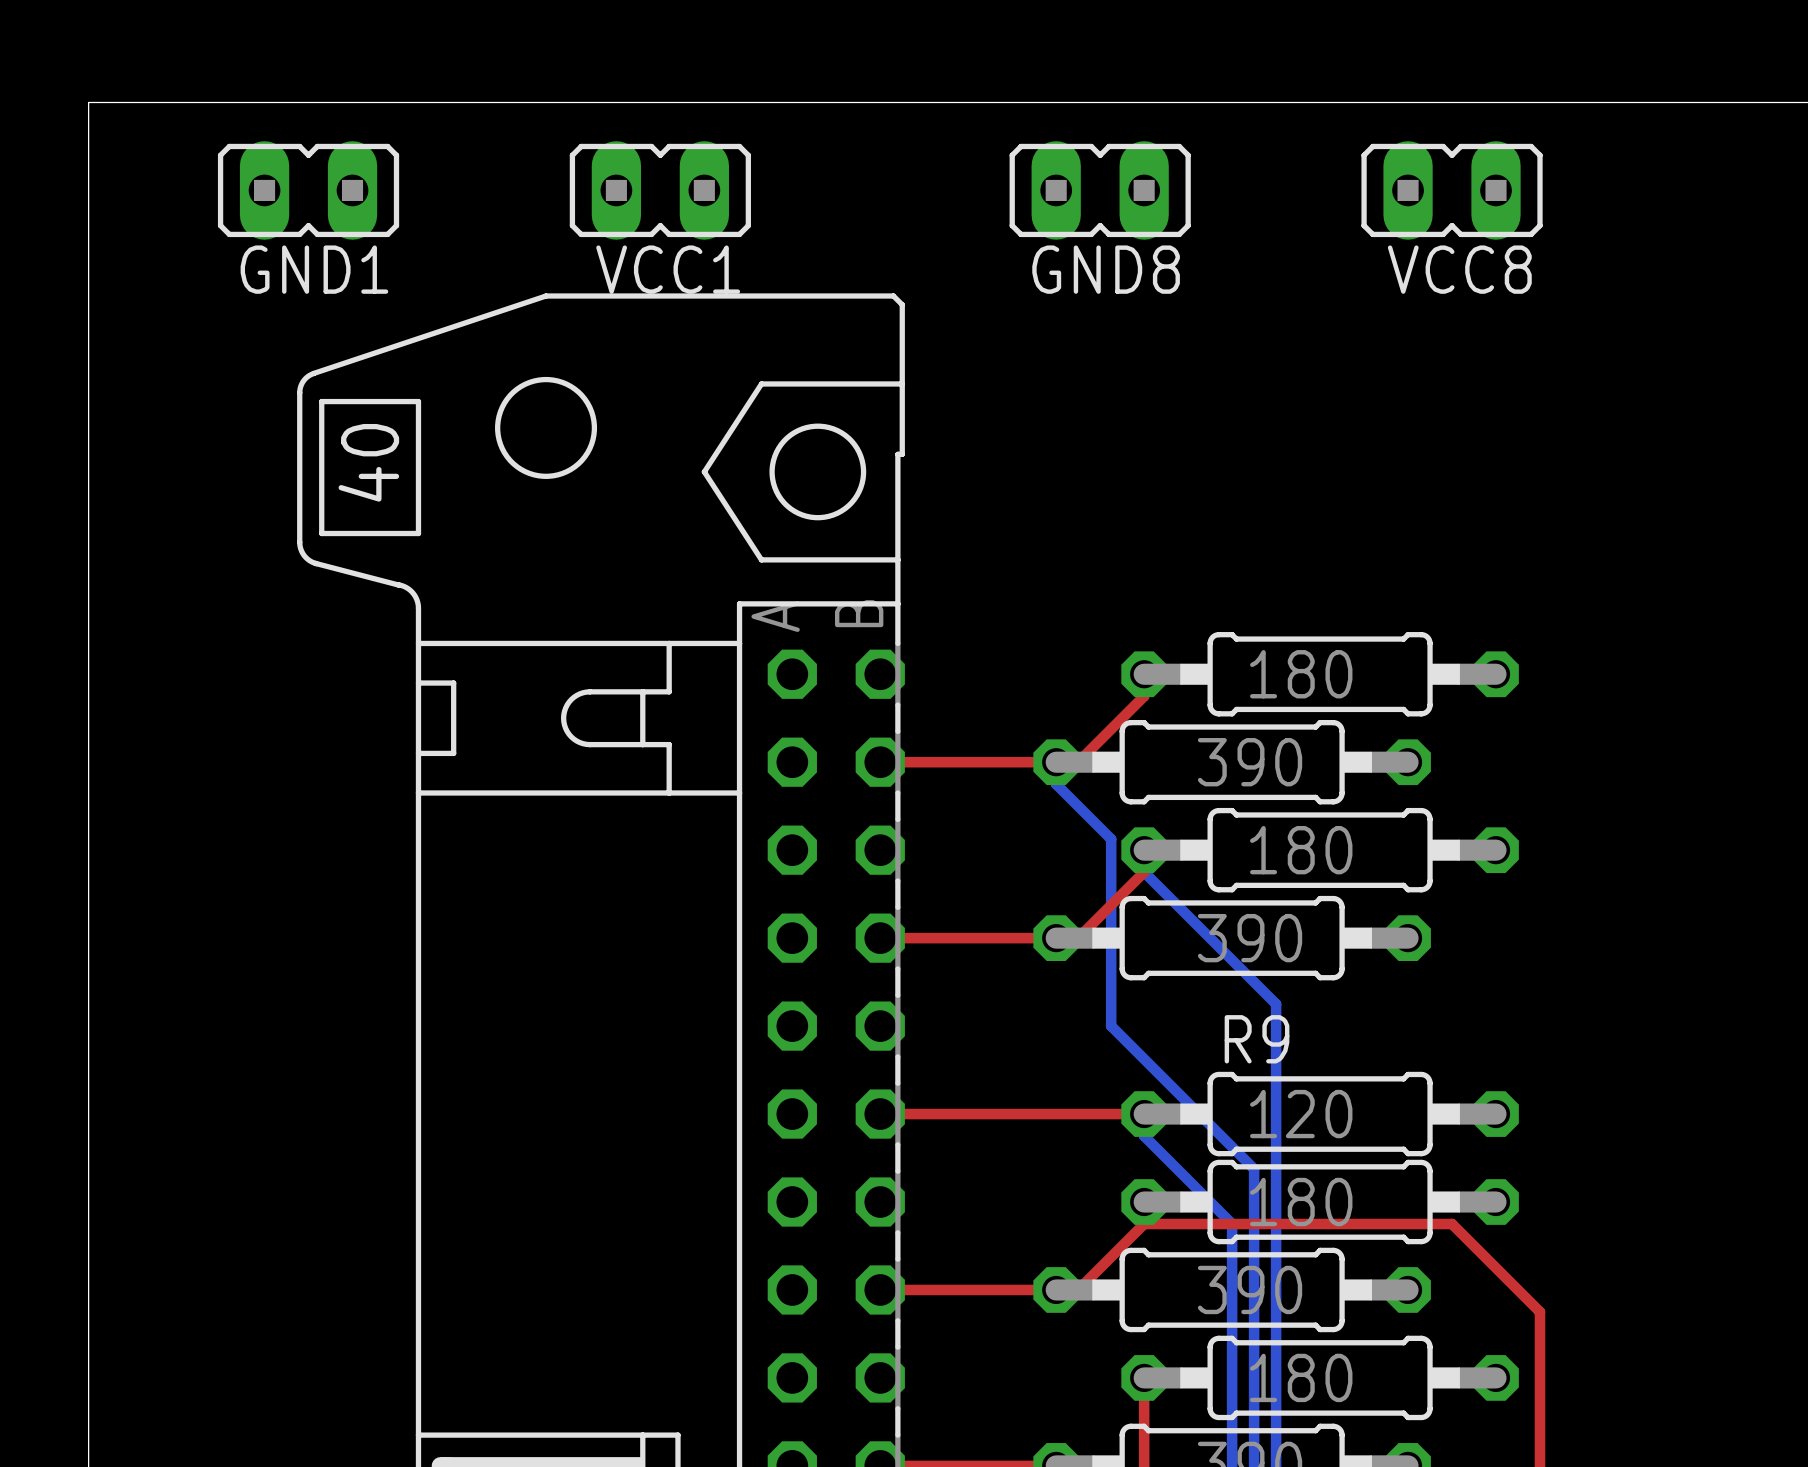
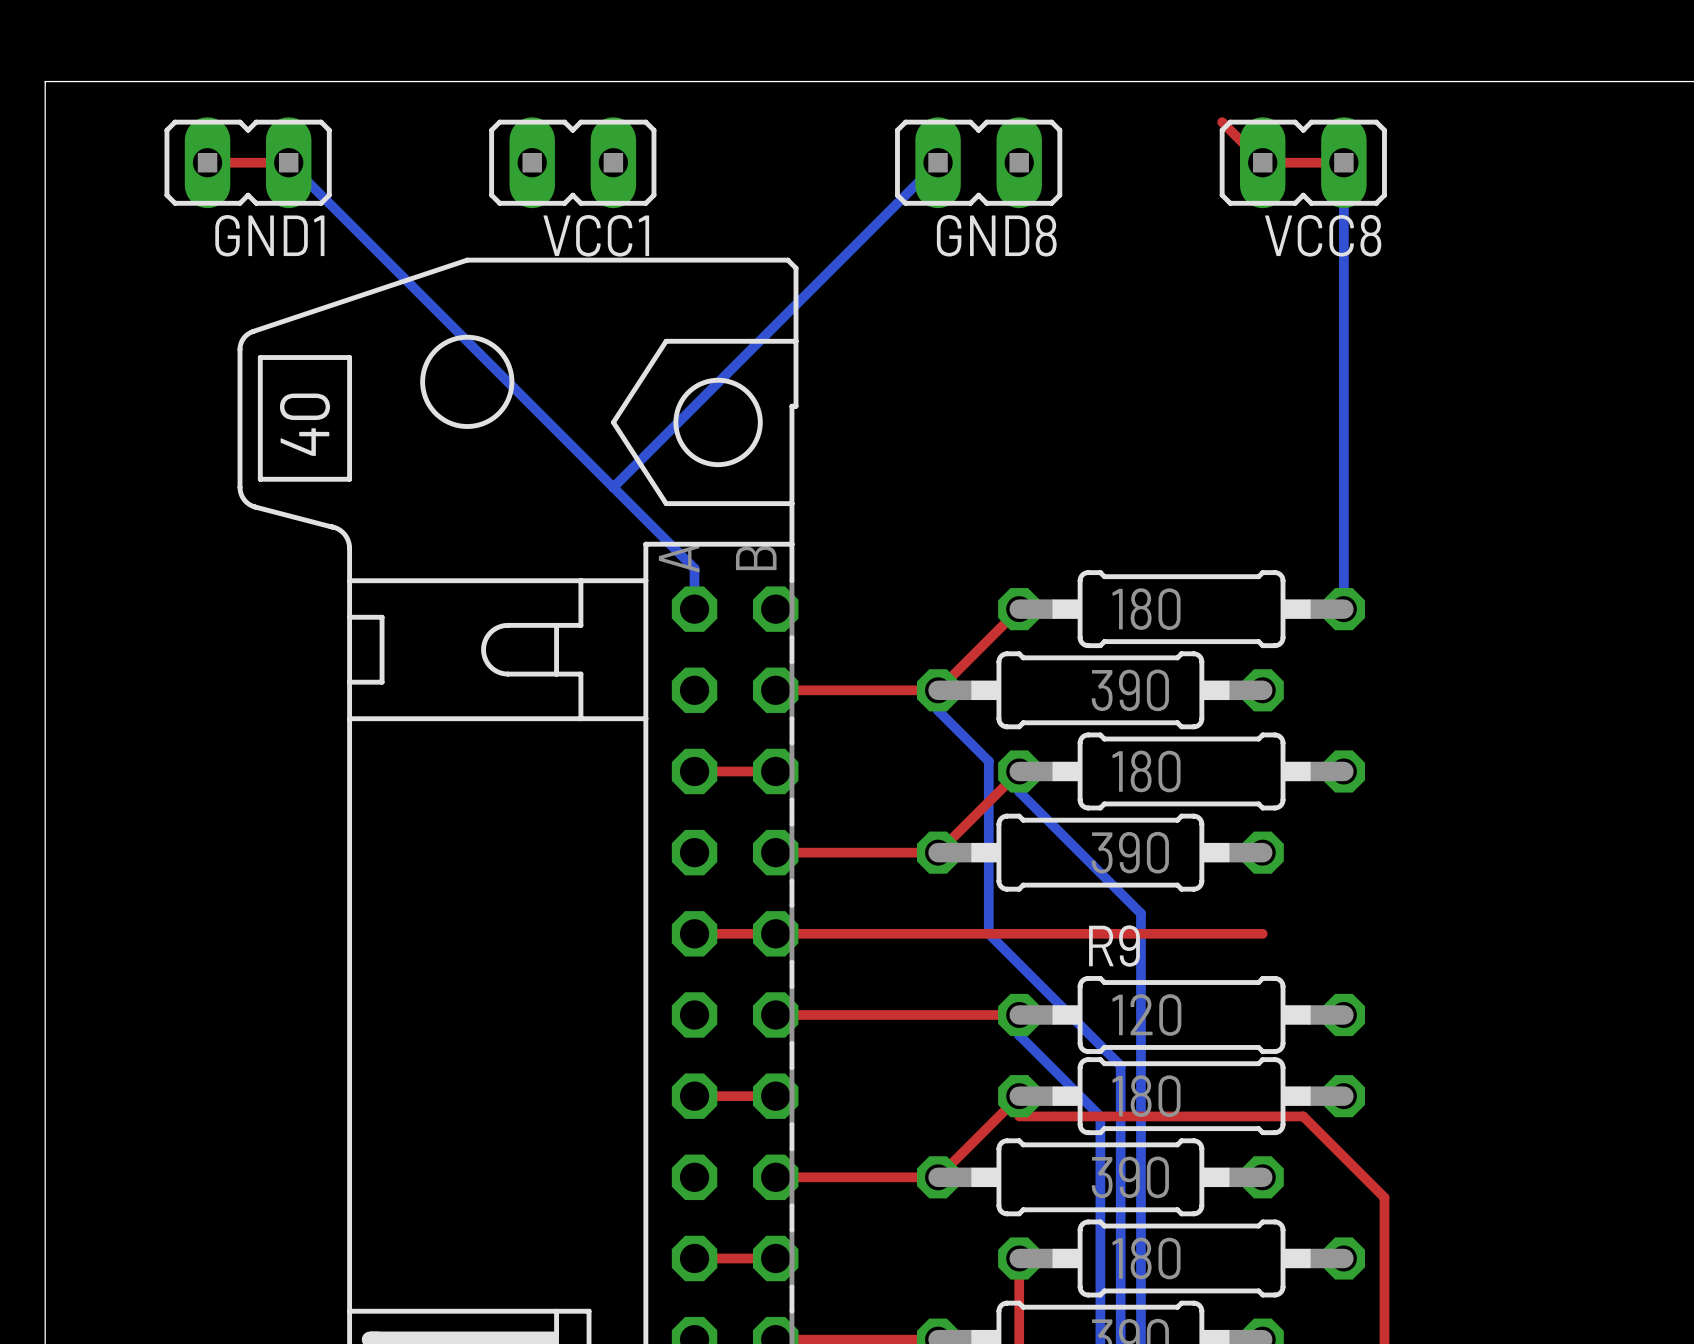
top track: none -> (1222, 122) (1262, 162) (1343, 162)
top track: none -> (207, 162) (288, 162)
bottom track: none -> (288, 162) (694, 568) (694, 609)
bottom track: none -> (938, 162) (613, 487)
bottom track: none -> (1343, 162) (1343, 609)
top track: (1144, 674) (1144, 696) (1078, 762) (1056, 762) -> (1019, 609) (938, 690)
top track: none -> (694, 771) (775, 771)
top track: (1144, 850) (1144, 872) (1078, 938) (1056, 938) -> (1019, 771) (938, 852)
top track: none -> (694, 933) (1262, 933)
top track: none -> (694, 1096) (775, 1096)
top track: (1144, 1202) (1144, 1224) (1078, 1289) (1056, 1289) -> (1019, 1096) (938, 1177)
top track: none -> (694, 1258) (775, 1258)

